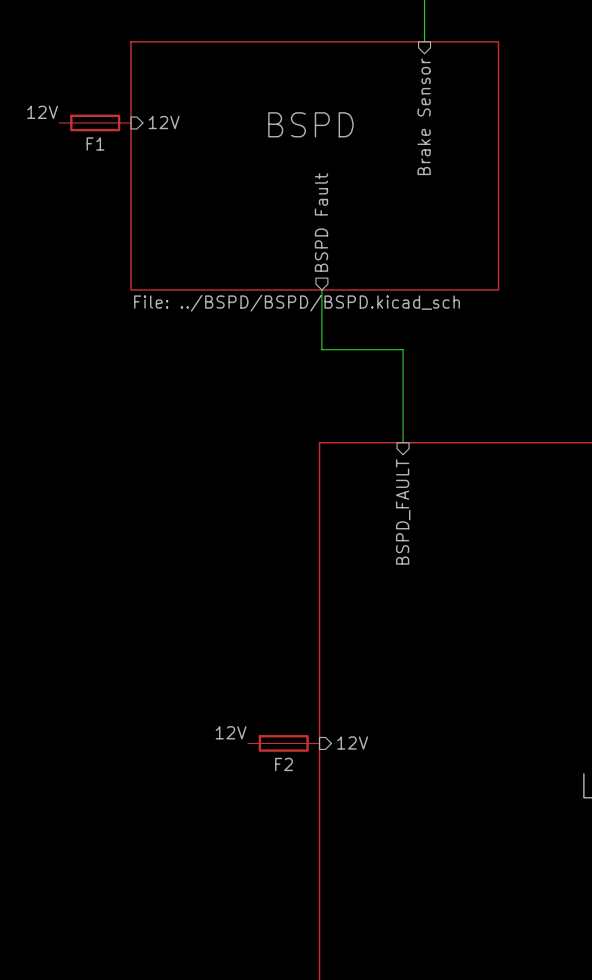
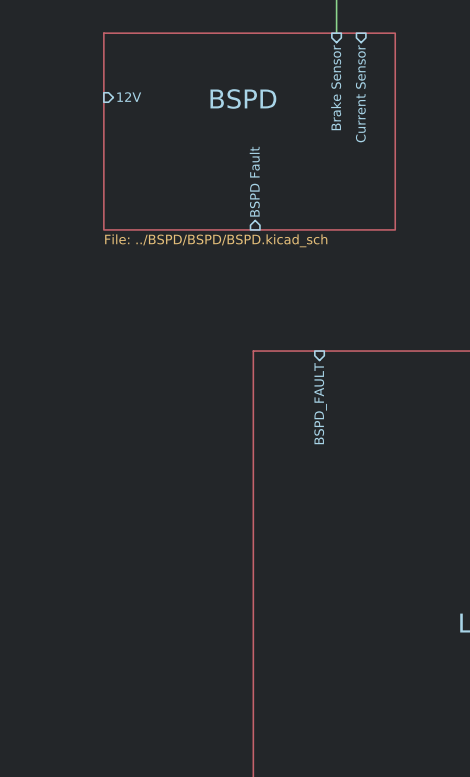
label: 12V (42, 112) -> none
F1: (95, 122) -> none
sheet pin: none -> Current Sensor (360, 93)
sheet pin shape: output (321, 222) -> input (254, 181)
wire: (321, 290) (321, 349) (403, 349) (403, 442) -> none
label: 12V (231, 732) -> none
sheet pin: 12V (352, 742) -> none
F2: (283, 743) -> none

